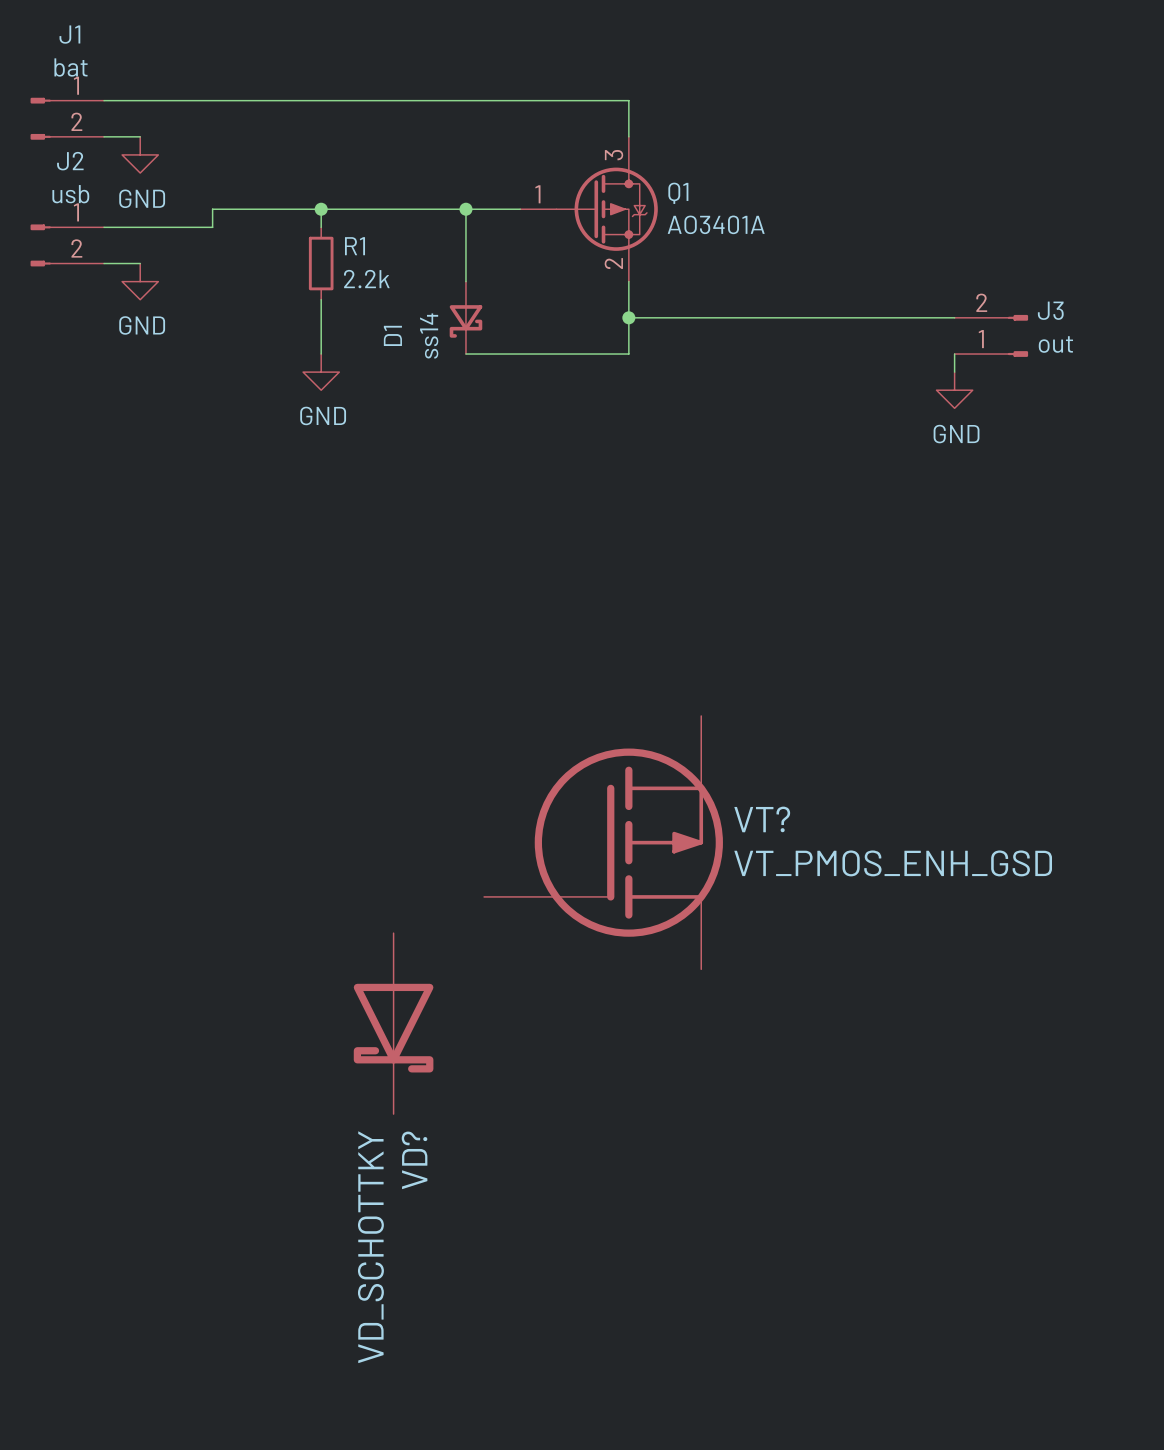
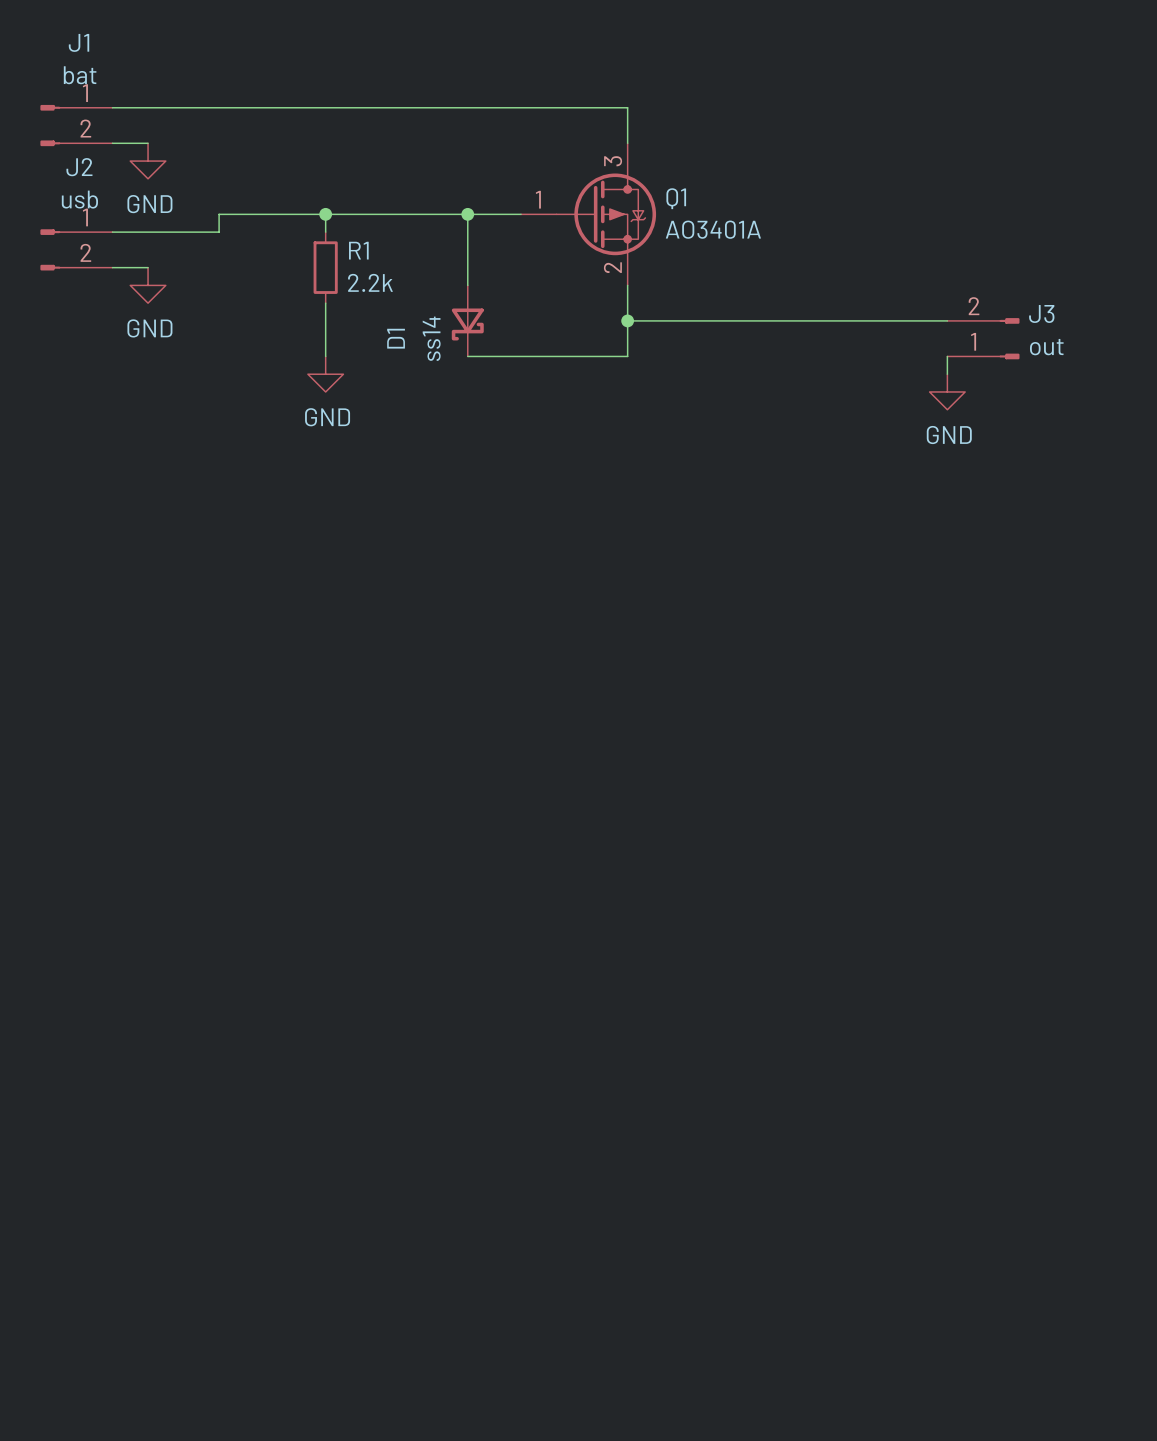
VT?: VT_PMOS_ENH_GSD (603, 842) -> none
VD?: VD_SCHOTTKY (393, 1023) -> none

